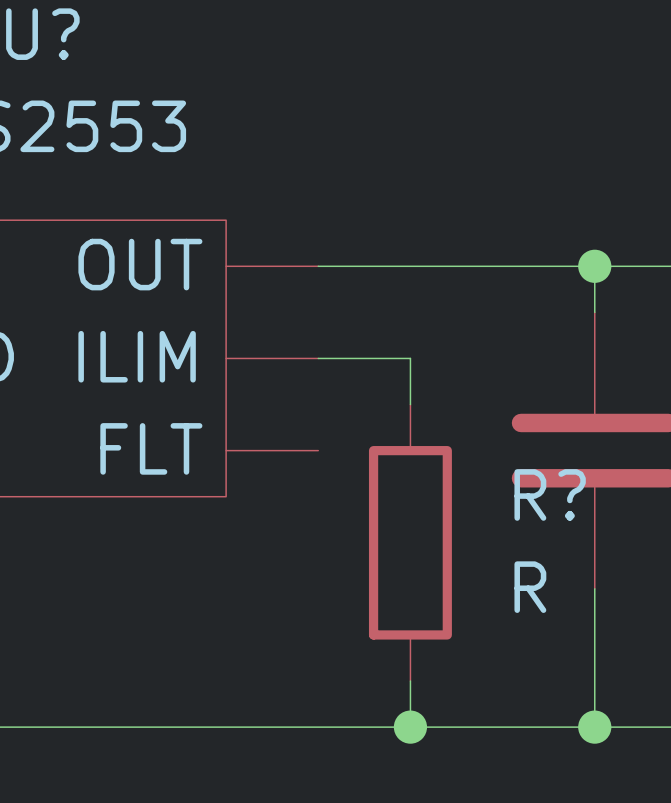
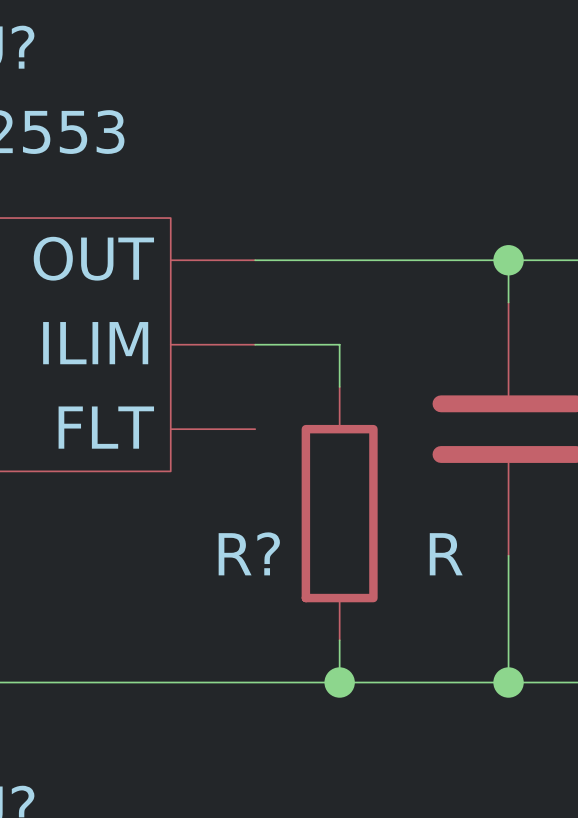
R? name position: R? (550, 494) -> R? (249, 553)

